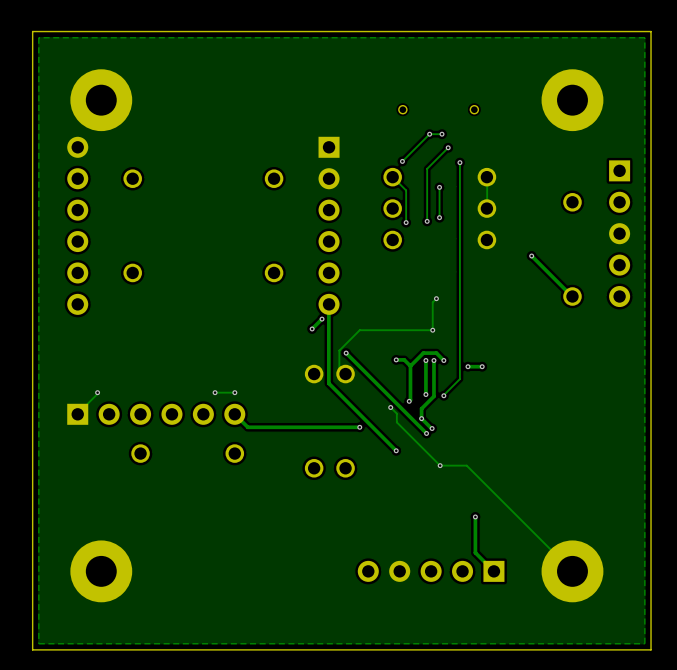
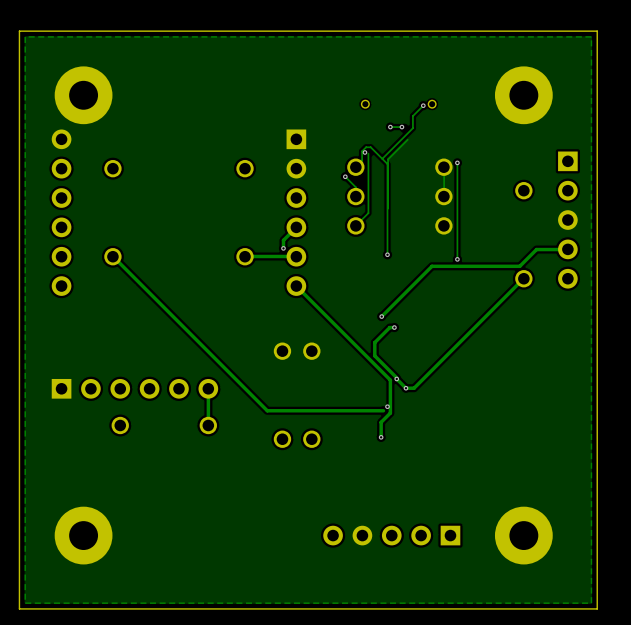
track: none -> (423, 105) (412, 116) (412, 128) (382, 158)
via: none -> (423, 105)
track: (429, 134) (402, 161) -> none
via: (448, 147) -> none
track: (459, 162) (459, 379) (443, 395) -> none
via: (459, 162) -> none
track: none -> (457, 162) (457, 259)
via: none -> (457, 162)
track: (392, 176) (406, 190) -> (368, 153) (368, 179)
track: none -> (355, 166) (362, 160) (362, 151) (366, 147) (370, 147) (387, 164) (387, 254)
track: none -> (345, 176) (355, 187) (355, 196)
via: none -> (345, 176)
track: (439, 187) (439, 217) -> none
via: (439, 187) -> none
via: (439, 217) -> none
via: (427, 221) -> none
track: none -> (368, 209) (368, 213) (355, 225)
via: (406, 222) -> none
track: none -> (296, 227) (283, 240) (283, 248)
track: (531, 256) (571, 296) -> none
via: (531, 256) -> none
via: none -> (283, 248)
track: none -> (567, 249) (536, 249) (519, 266) (431, 266) (381, 316)
via: none -> (387, 254)
track: none -> (113, 256) (267, 410) (383, 410)
track: none -> (296, 256) (244, 256)
via: none -> (457, 259)
track: none -> (523, 278) (414, 388) (405, 388) (396, 378)
track: (436, 298) (432, 302) (432, 330) (359, 330) (339, 350) (339, 367) (345, 374) -> none
via: (436, 298) -> none
track: (328, 304) (328, 383) (396, 450) -> (296, 285) (390, 380) (390, 413) (381, 422) (381, 437)
track: (322, 319) (312, 328) -> none
via: (322, 319) -> none
via: (312, 328) -> none
via: (432, 330) -> none
via: none -> (381, 316)
track: none -> (394, 327) (389, 327) (374, 342) (374, 355) (396, 377)
via: none -> (394, 327)
track: (346, 353) (426, 433) -> none
via: (346, 353) -> none
track: (396, 359) (404, 359) (410, 366) -> none
via: (396, 359) -> none
track: (425, 360) (425, 394) -> none
via: (425, 360) -> none
track: (433, 360) (433, 396) (421, 408) (421, 418) (431, 428) -> none
via: (433, 360) -> none
track: (443, 360) (436, 353) (423, 353) (410, 366) -> none
via: (443, 360) -> none
track: (410, 366) (409, 401) -> none
via: (467, 366) -> none
track: (482, 366) (467, 366) -> none
via: (482, 366) -> none
track: (97, 392) (77, 413) -> none
via: (97, 392) -> none
via: (215, 392) -> none
track: (234, 392) (215, 392) -> none
via: (234, 392) -> none
via: (425, 394) -> none
via: (443, 395) -> none
via: (409, 401) -> none
via: none -> (396, 378)
track: (390, 407) (396, 413) (396, 422) (440, 465) (466, 465) (572, 571) -> none
via: (390, 407) -> none
via: none -> (405, 388)
track: (234, 414) (247, 427) (359, 427) -> (208, 388) (208, 425)
via: (421, 418) -> none
via: (359, 427) -> none
via: (432, 428) -> none
via: (396, 450) -> none
via: (440, 465) -> none
via: none -> (381, 437)
track: (475, 516) (475, 552) (493, 571) -> none
via: (475, 516) -> none

